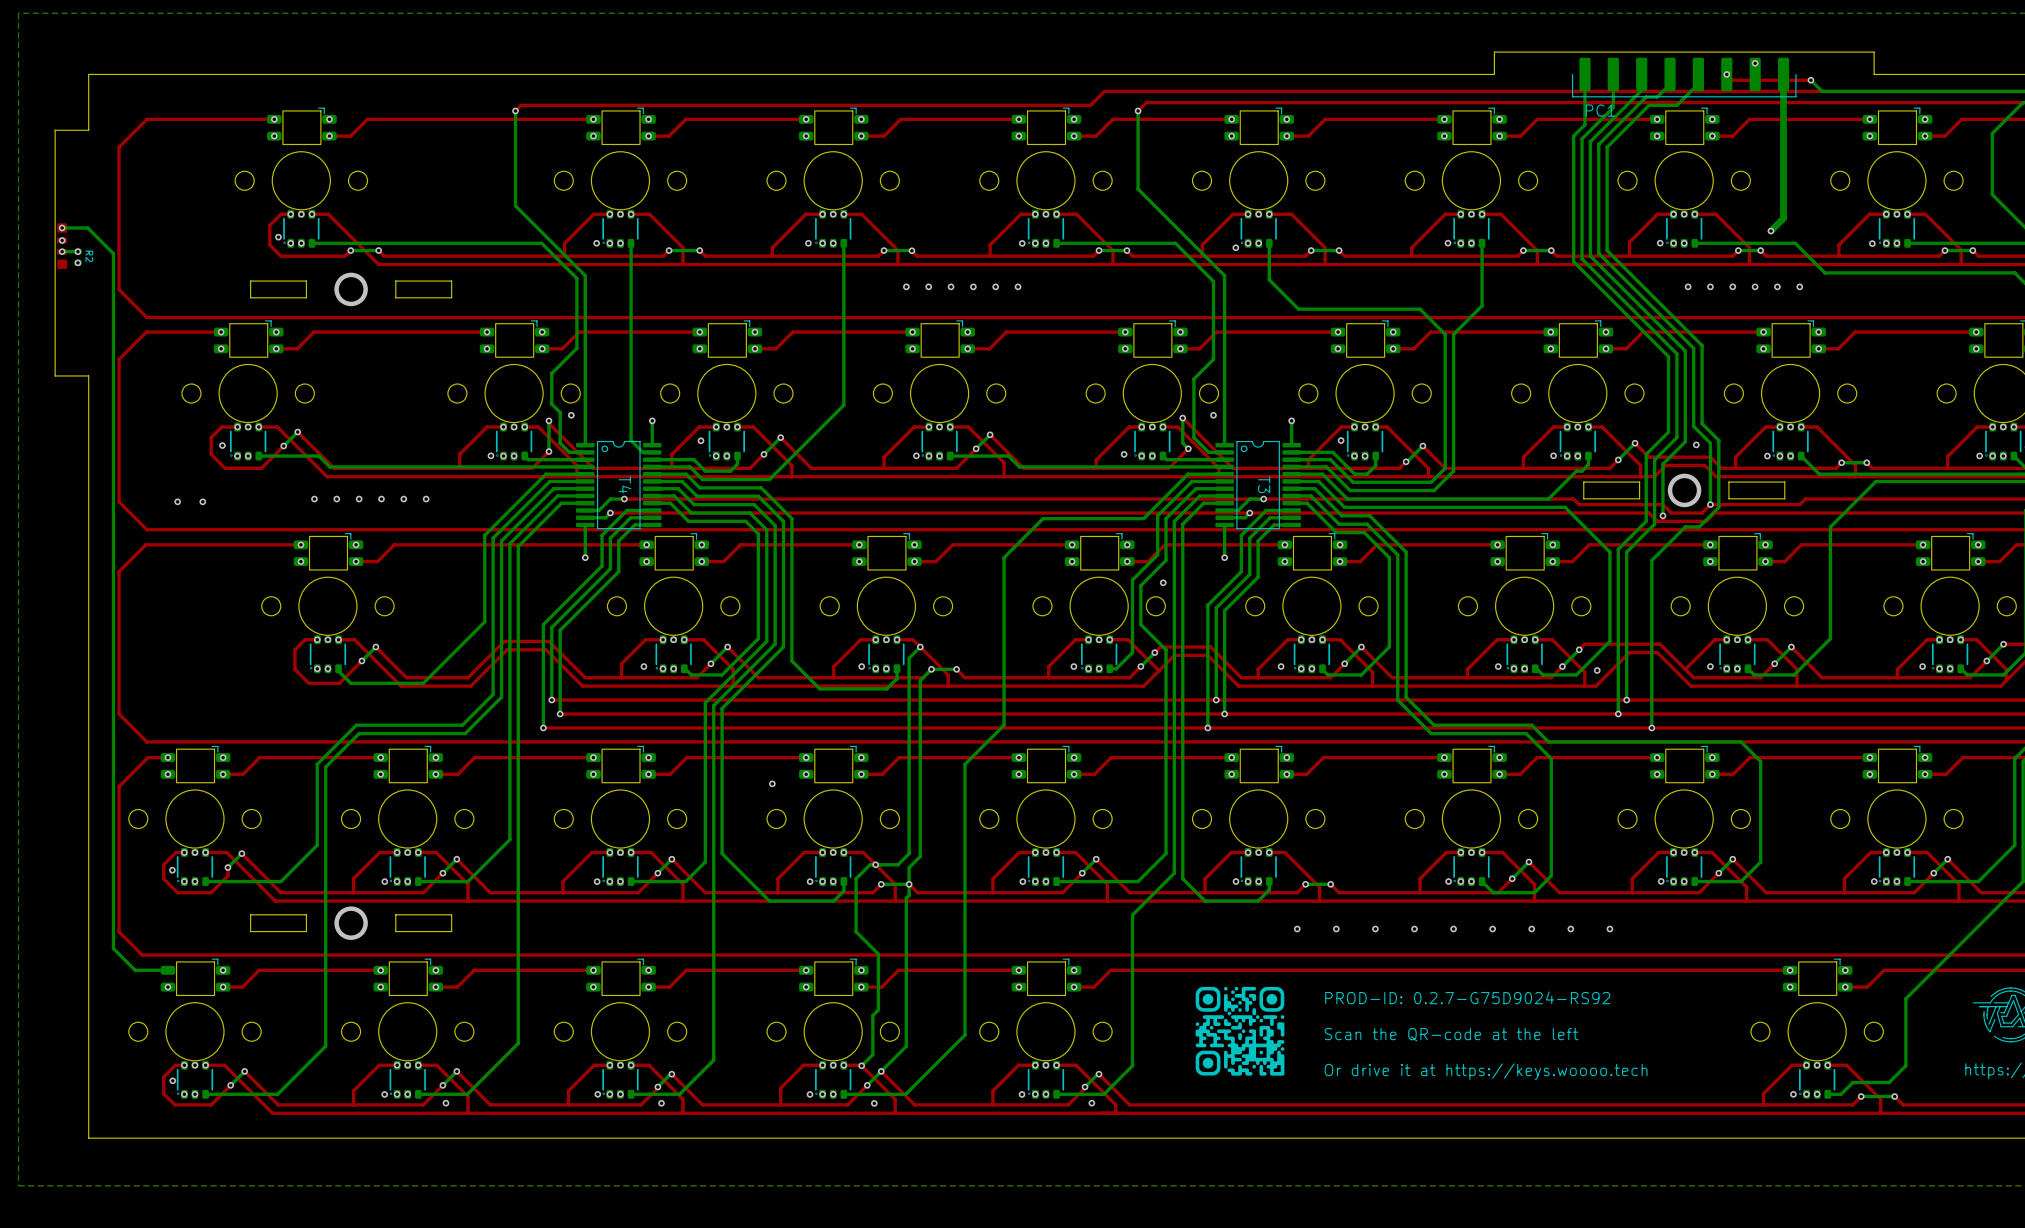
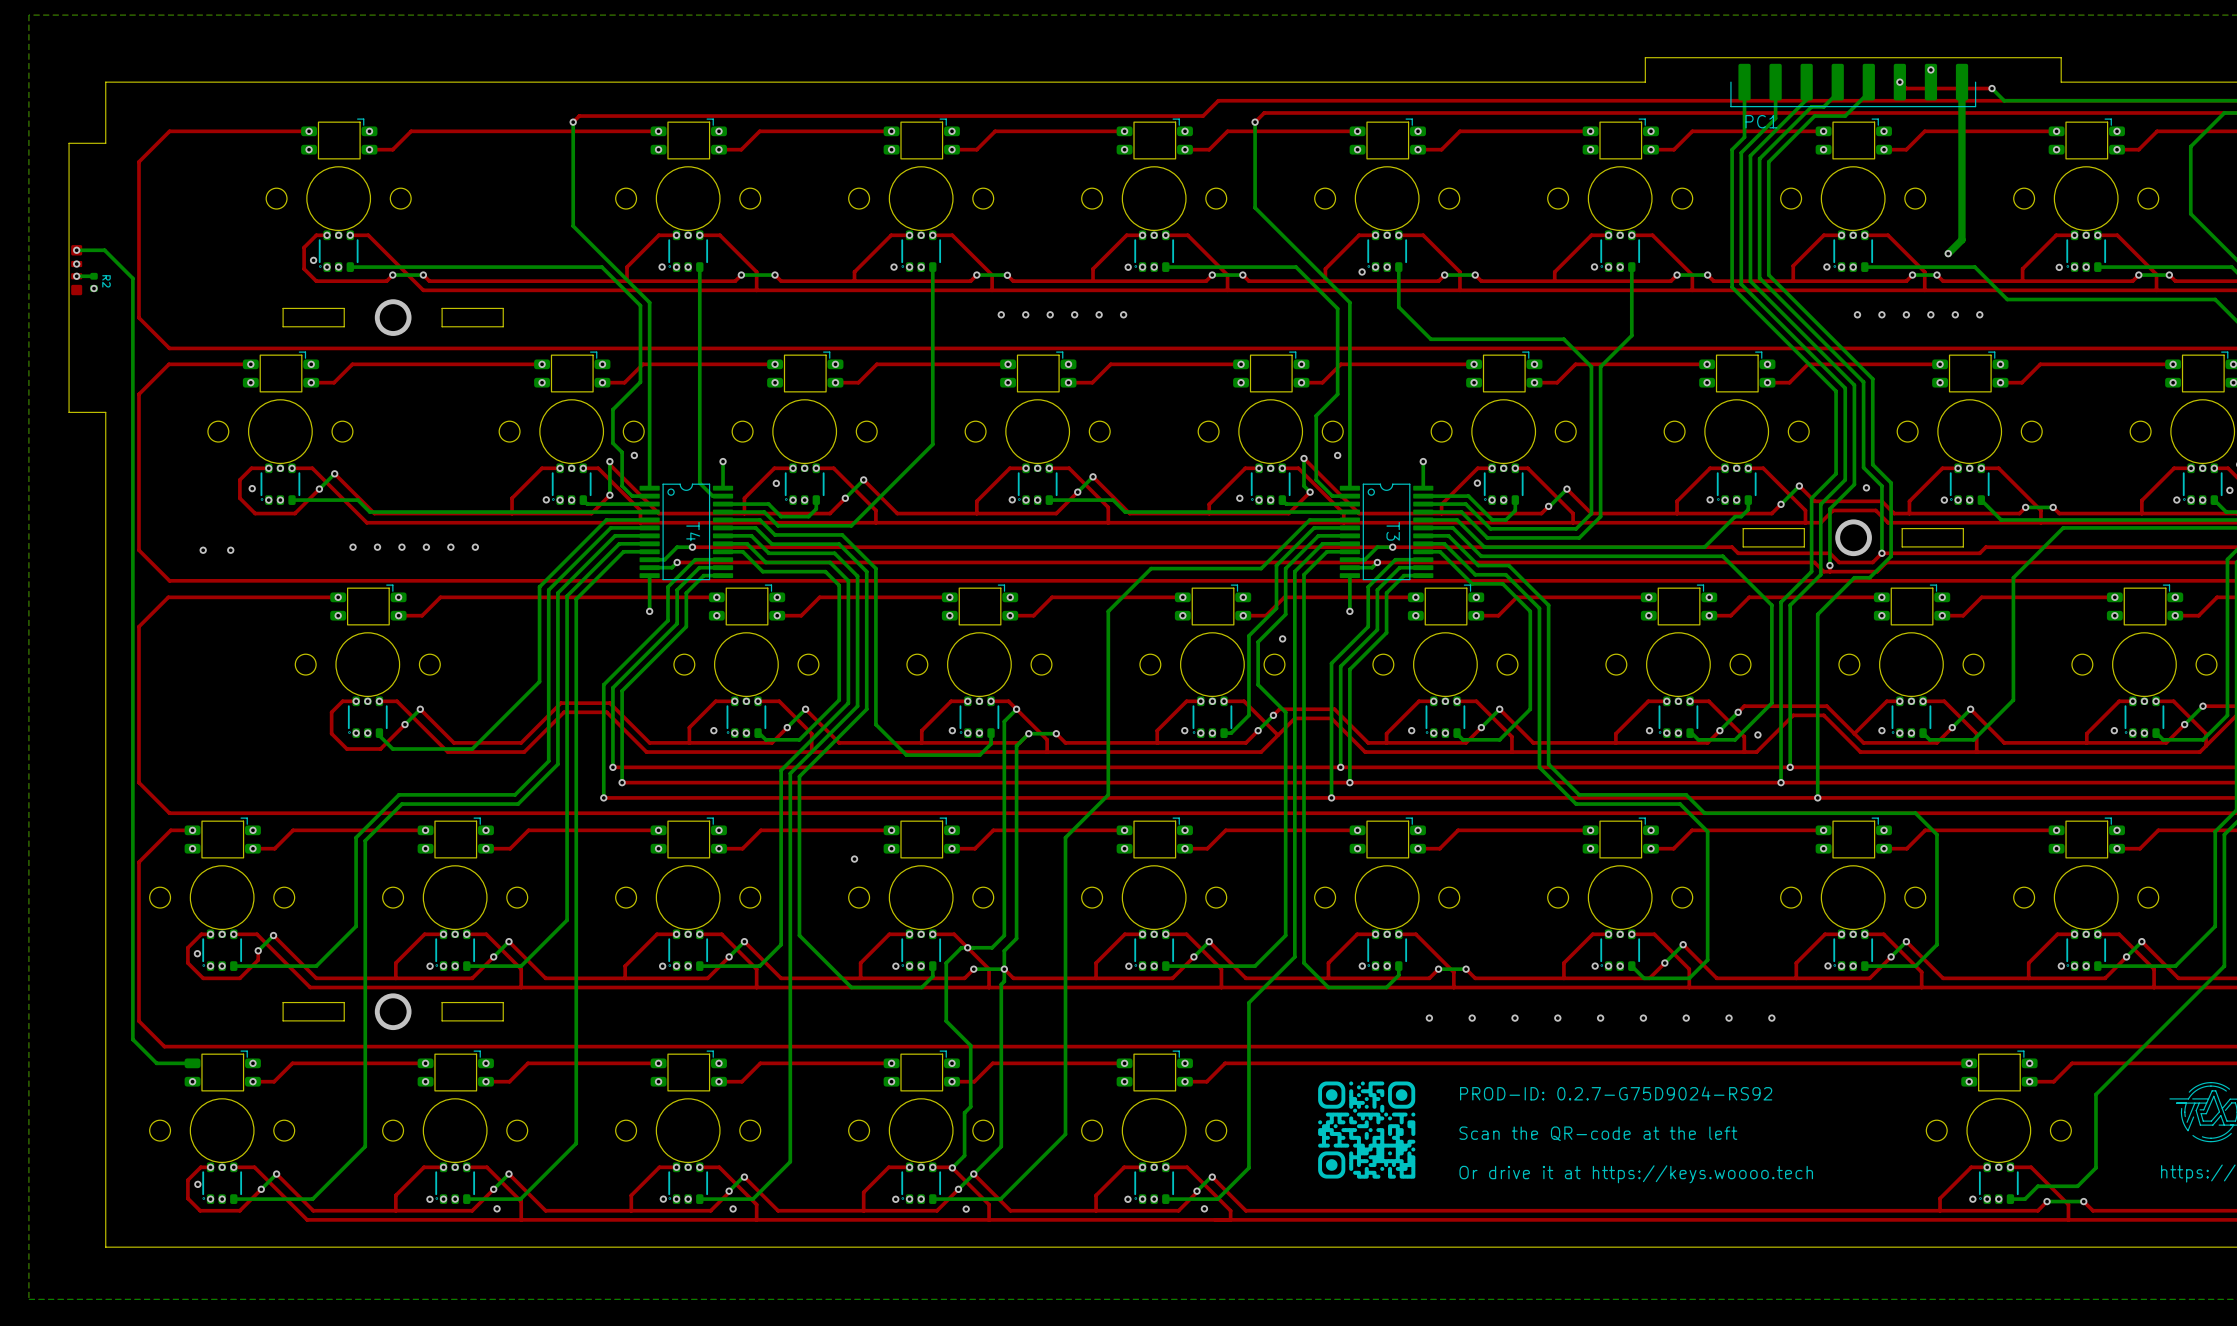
via: (77, 251) -> none

